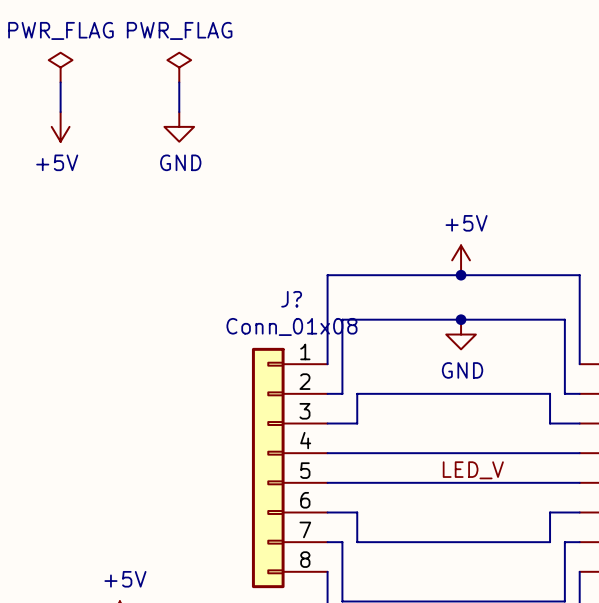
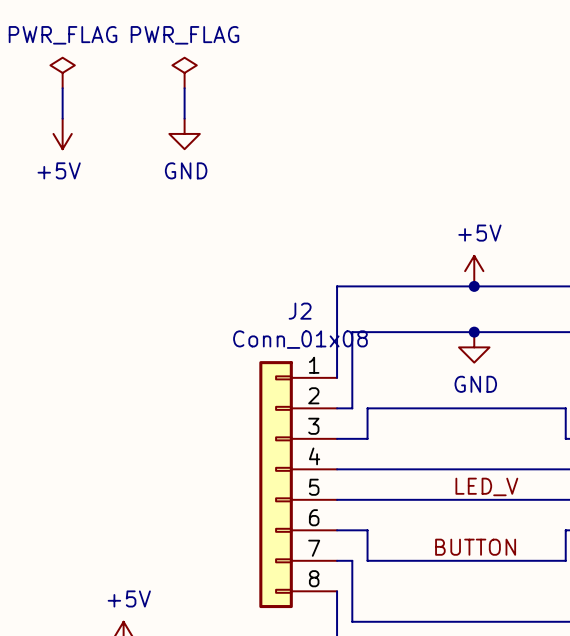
J? name: J? (291, 299) -> J2 (300, 311)
label: none -> BUTTON (475, 547)

